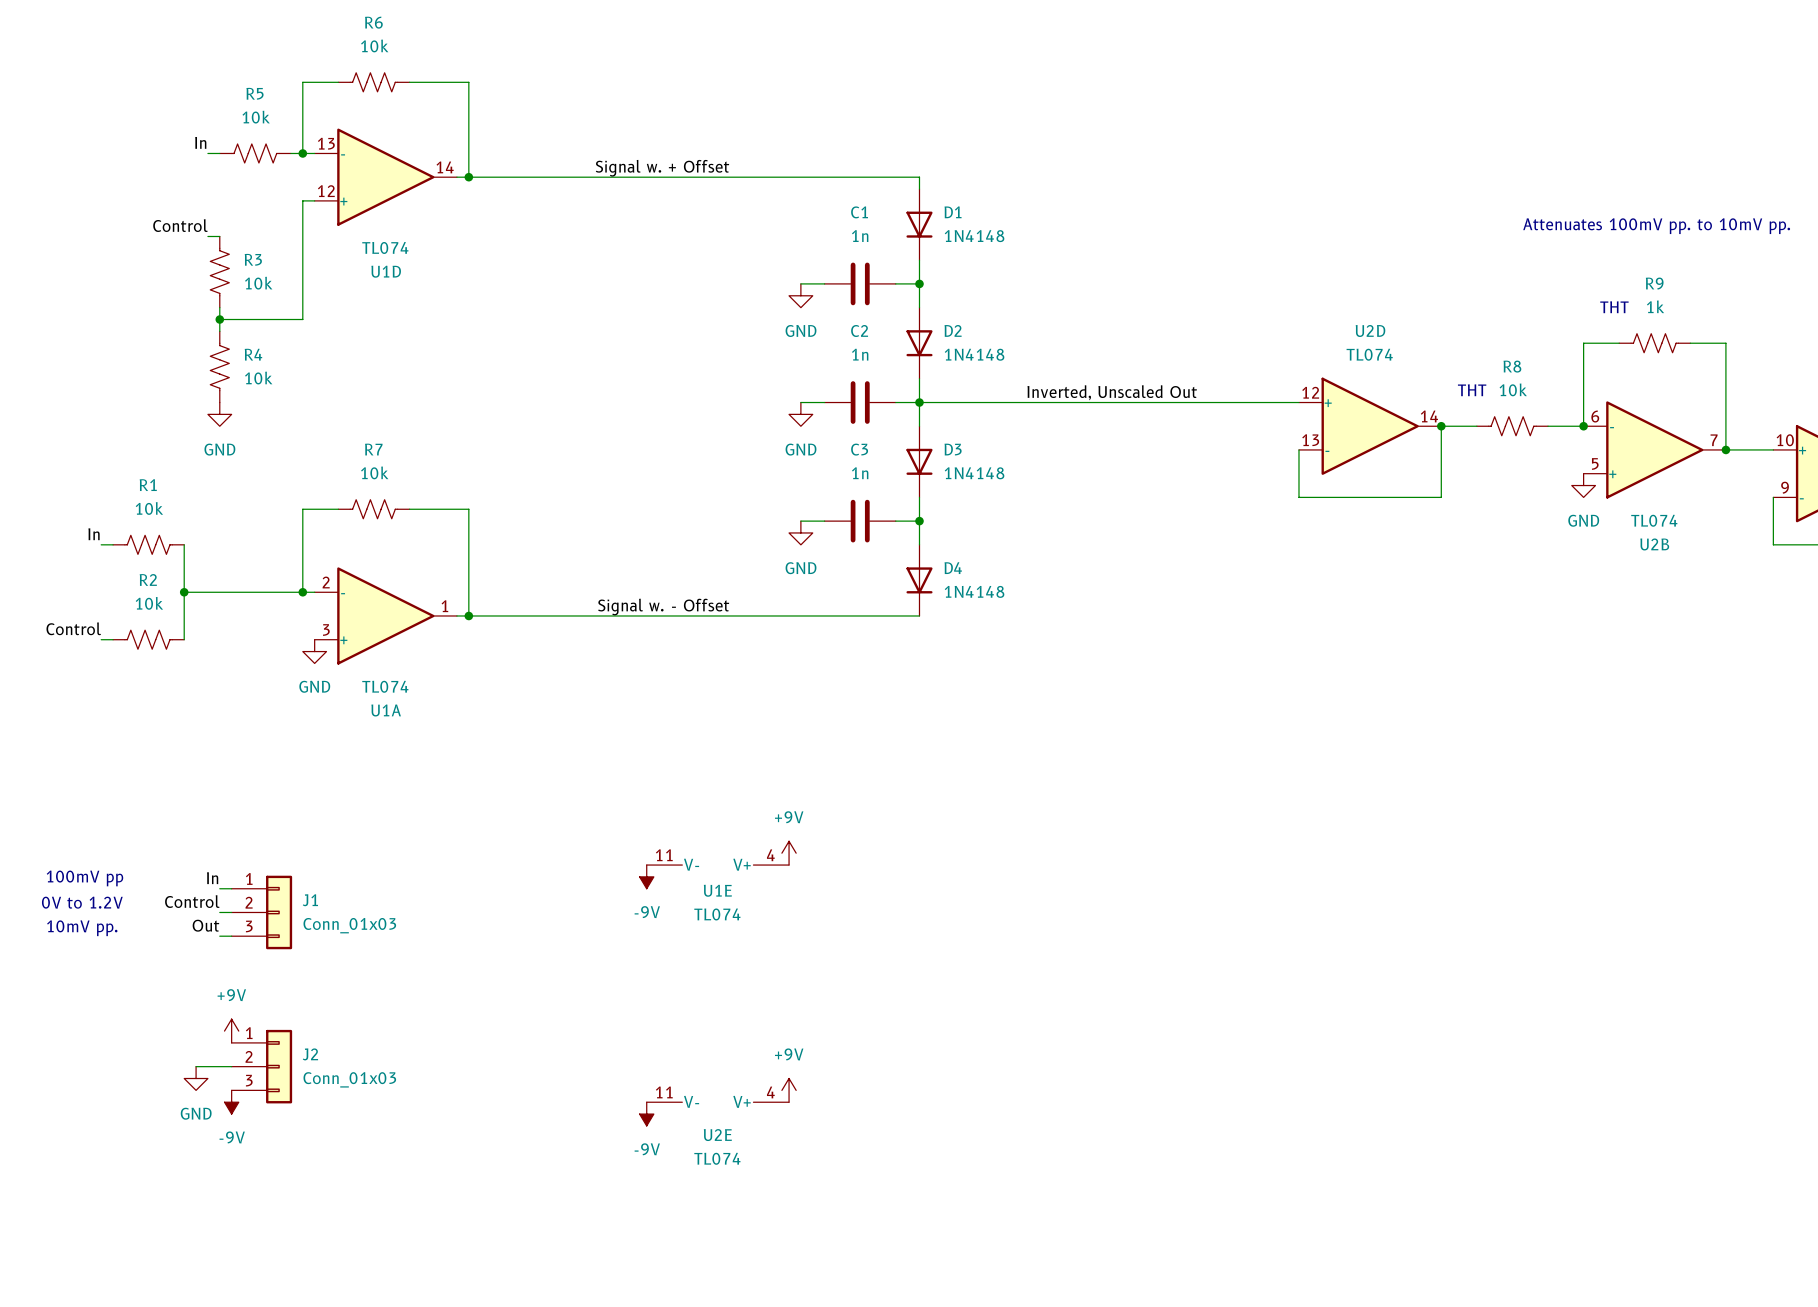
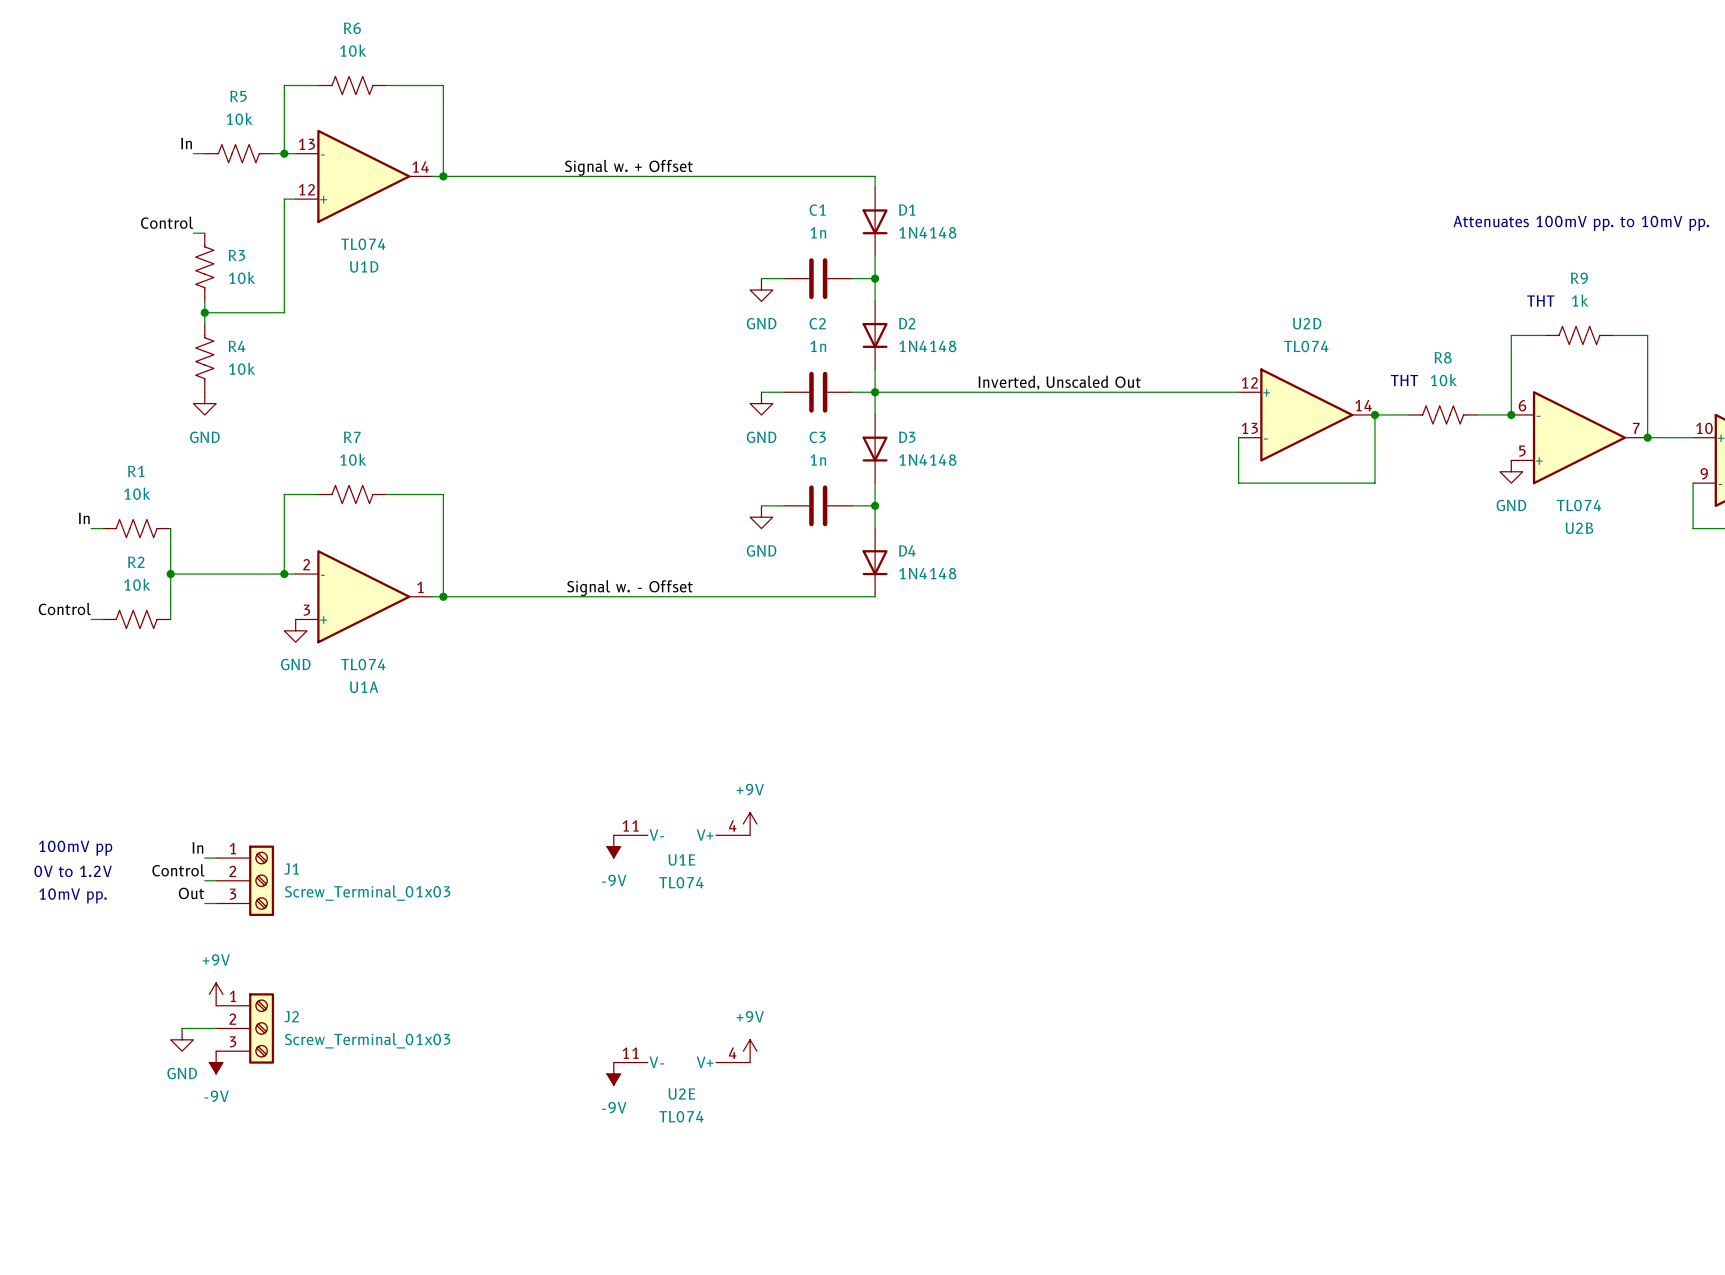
J1 symbol: [231, 875, 293, 950] -> [216, 845, 275, 916]
J1 value: Conn_01x03 (349, 925) -> Screw_Terminal_01x03 (367, 893)
J2 symbol: [231, 1029, 293, 1104] -> [216, 993, 275, 1064]
J2 value: Conn_01x03 (349, 1079) -> Screw_Terminal_01x03 (367, 1040)

